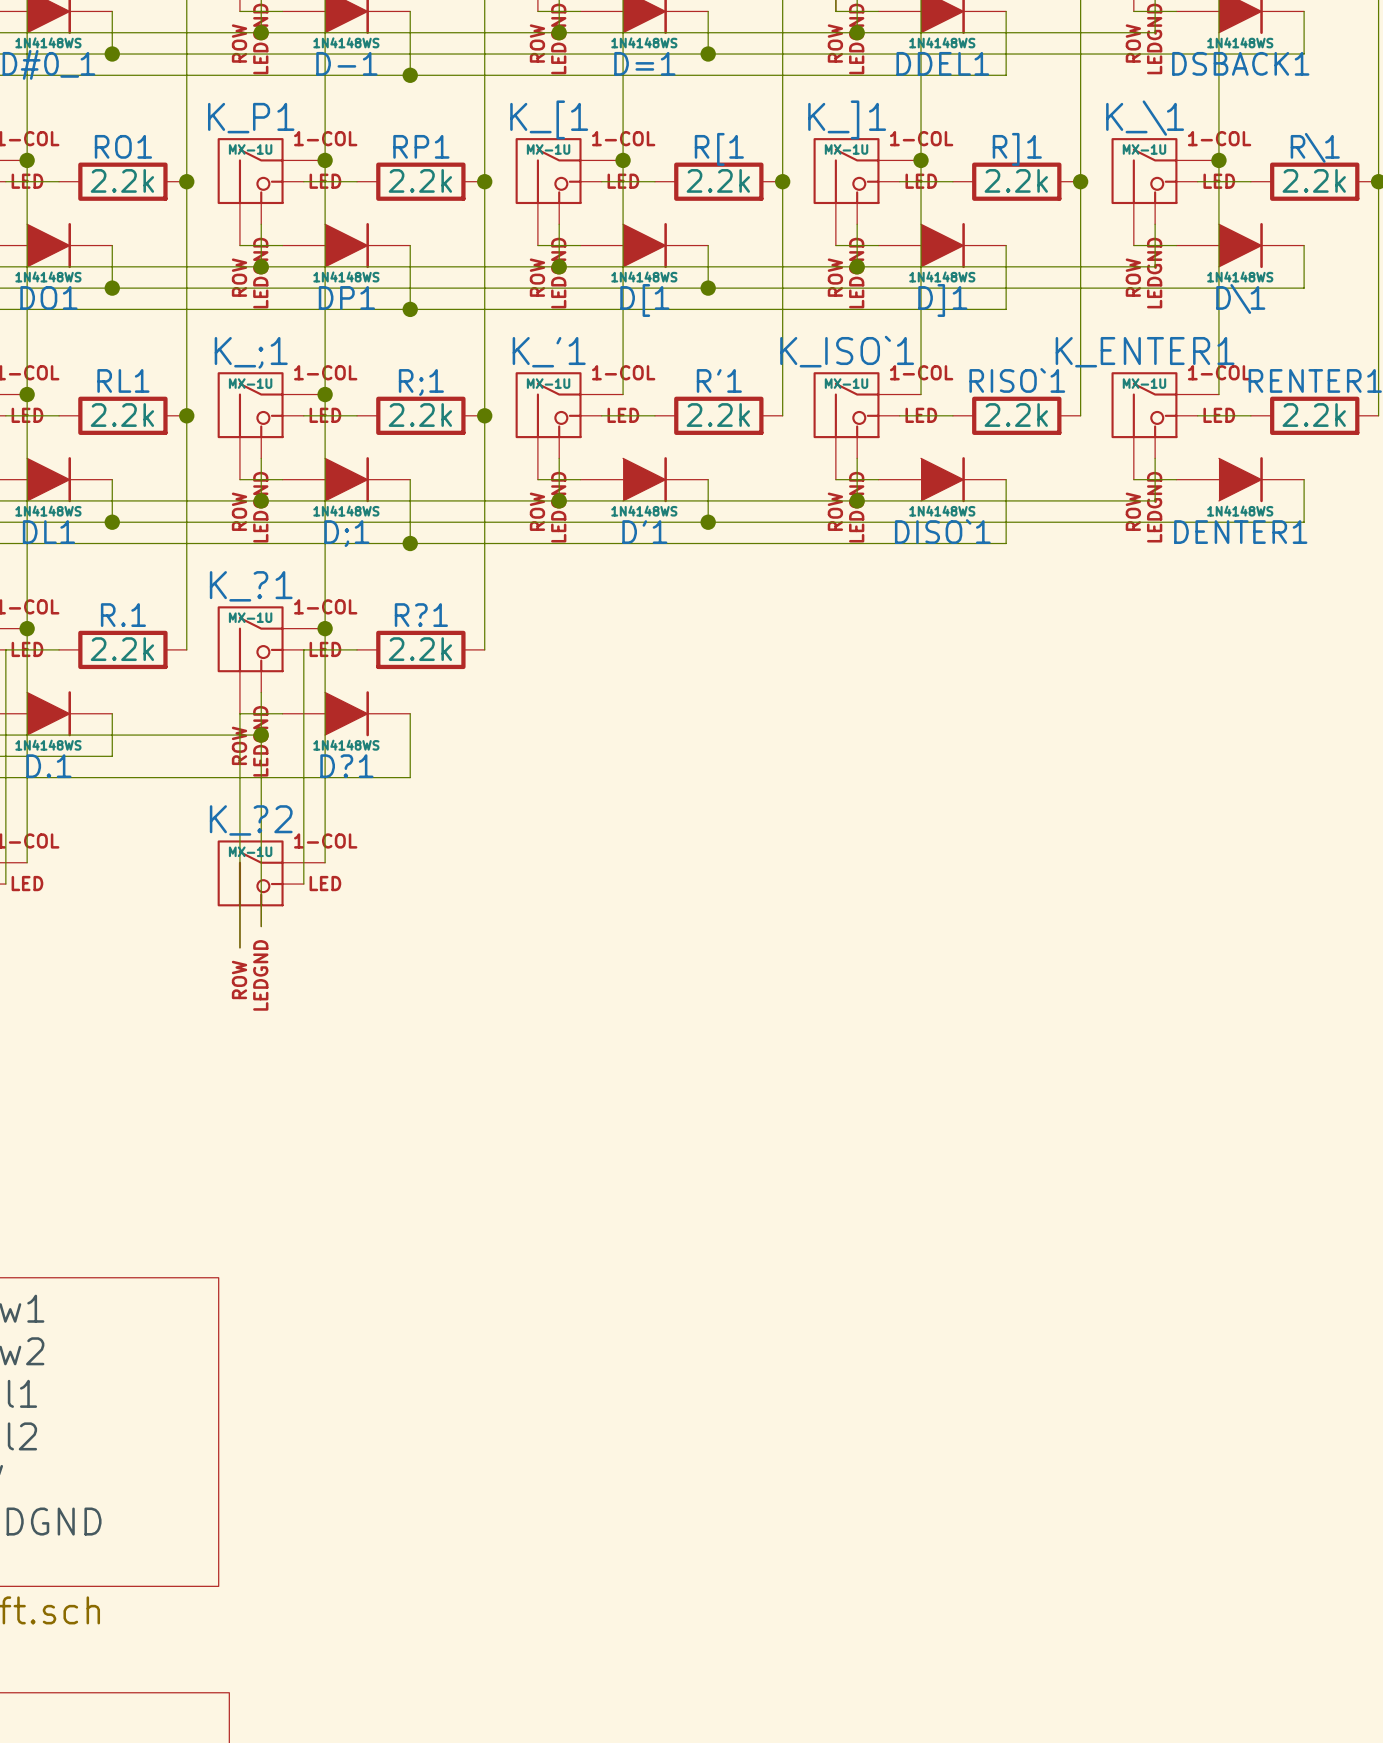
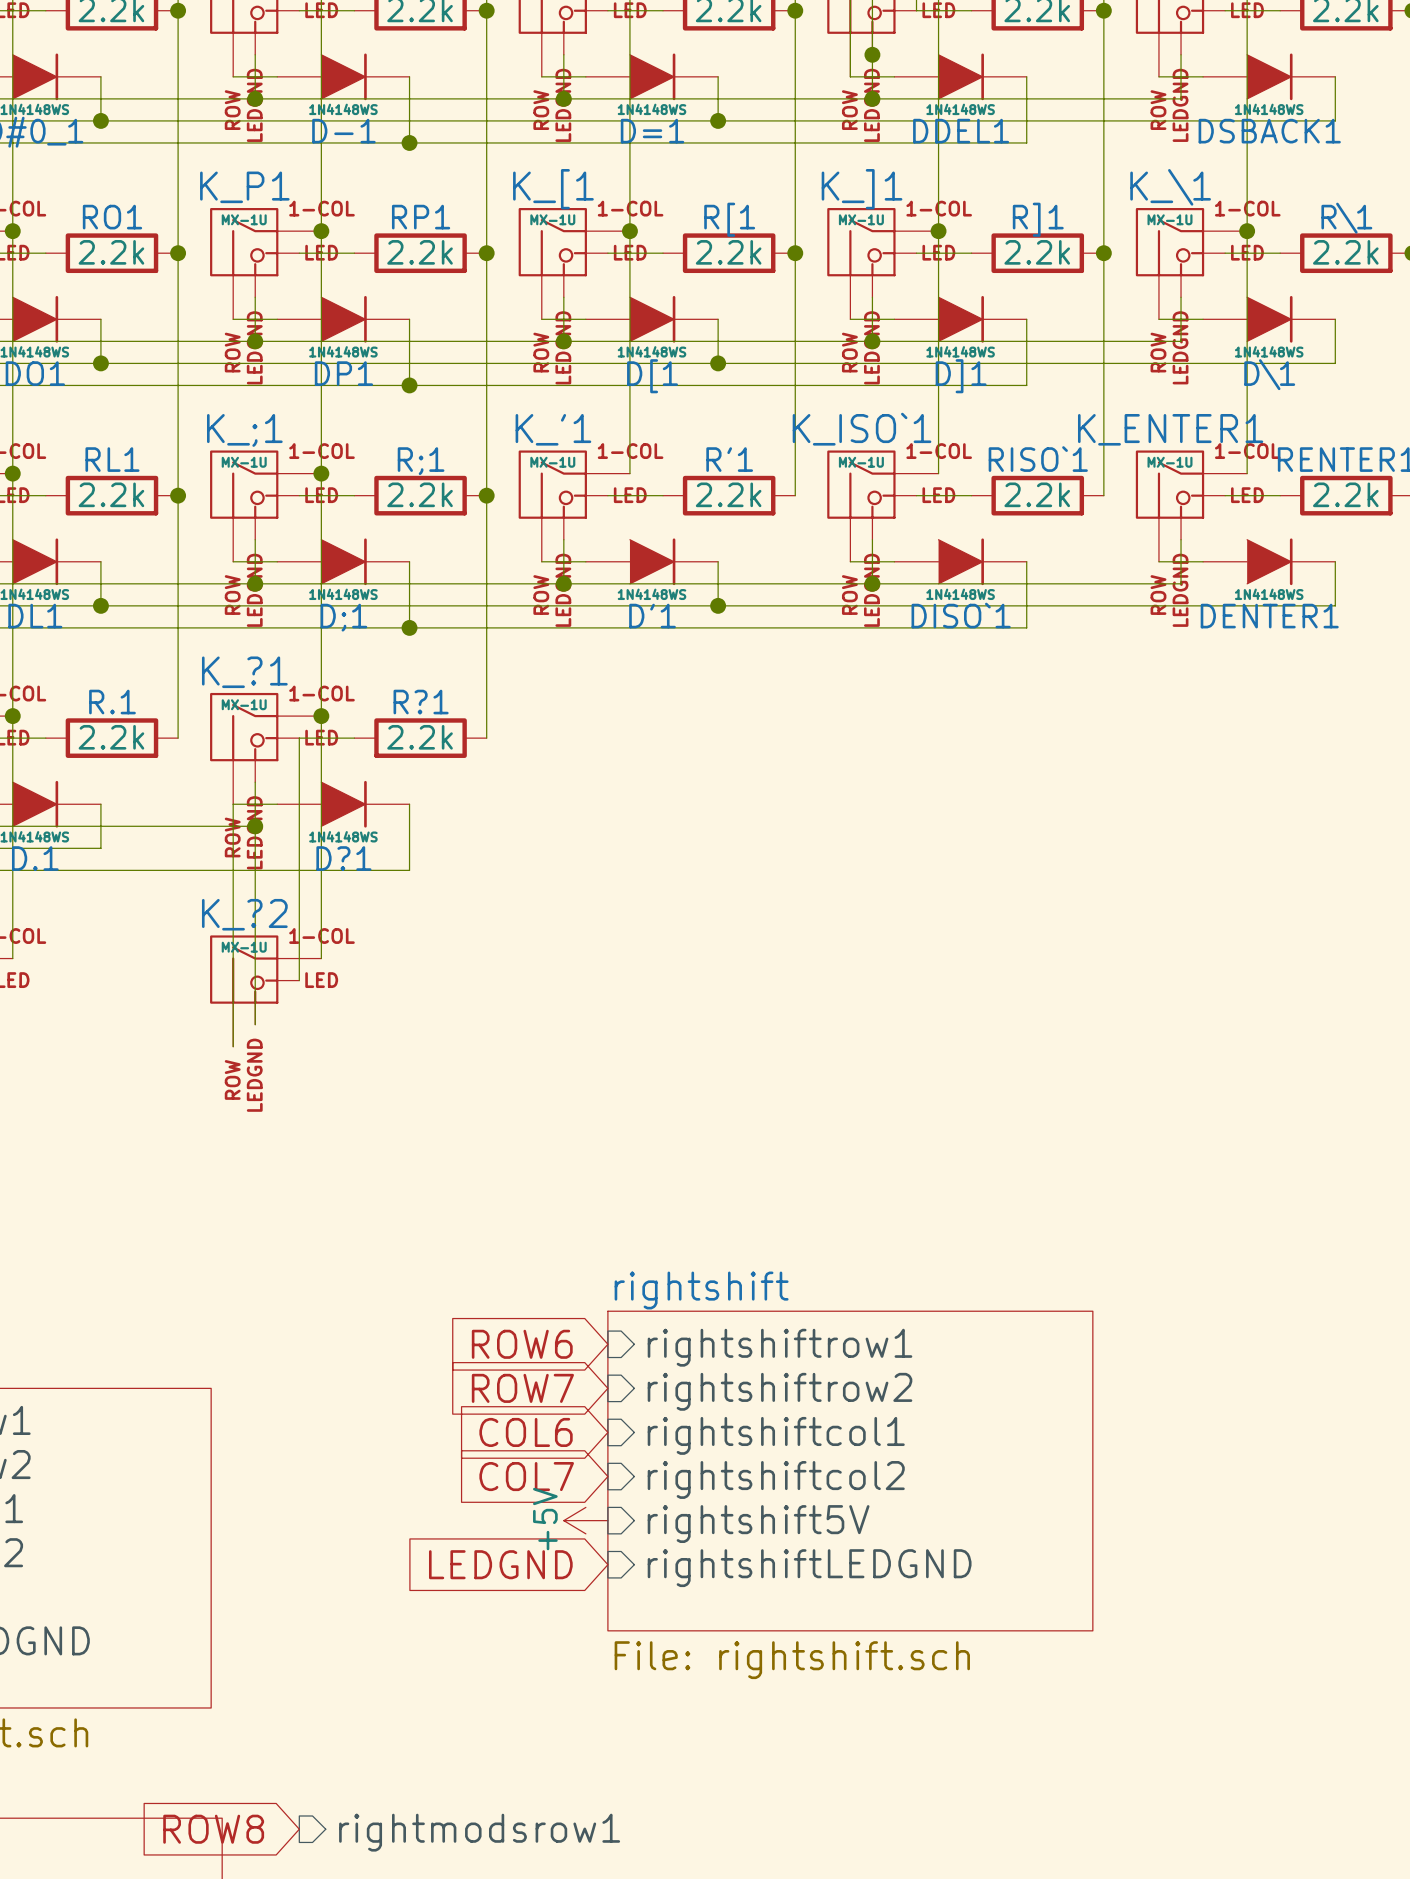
global label: none -> ROW6 (522, 1344)
sheet pin: none -> rightshiftrow1 (780, 1347)
global label: none -> ROW7 (522, 1388)
sheet pin: none -> rightshiftrow2 (780, 1391)
global label: none -> COL6 (526, 1432)
sheet pin: none -> rightshiftcol1 (776, 1435)
sheet rightshift: none -> File: rightshift.sch (850, 1471)
global label: none -> COL7 (526, 1476)
sheet pin: none -> rightshiftcol2 (776, 1479)
power symbol: none -> +5V (585, 1520)
sheet pin: none -> rightshift5V (758, 1524)
global label: none -> LEDGND (500, 1564)
sheet pin: none -> rightshiftLEDGND (809, 1568)
global label: none -> ROW8 (213, 1829)
sheet pin: none -> rightmodsrow1 (479, 1832)

